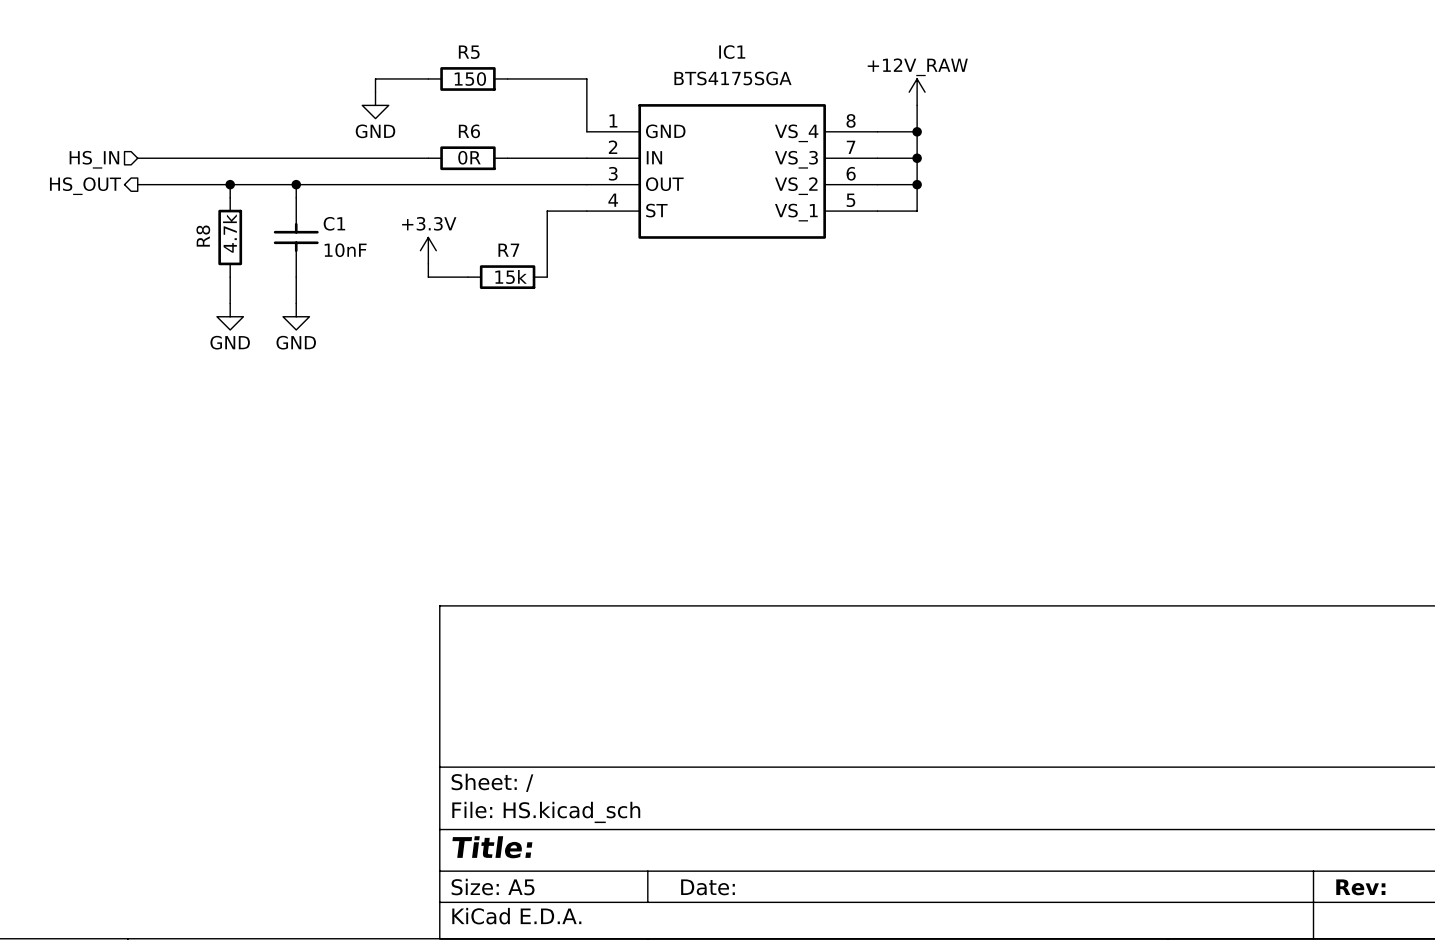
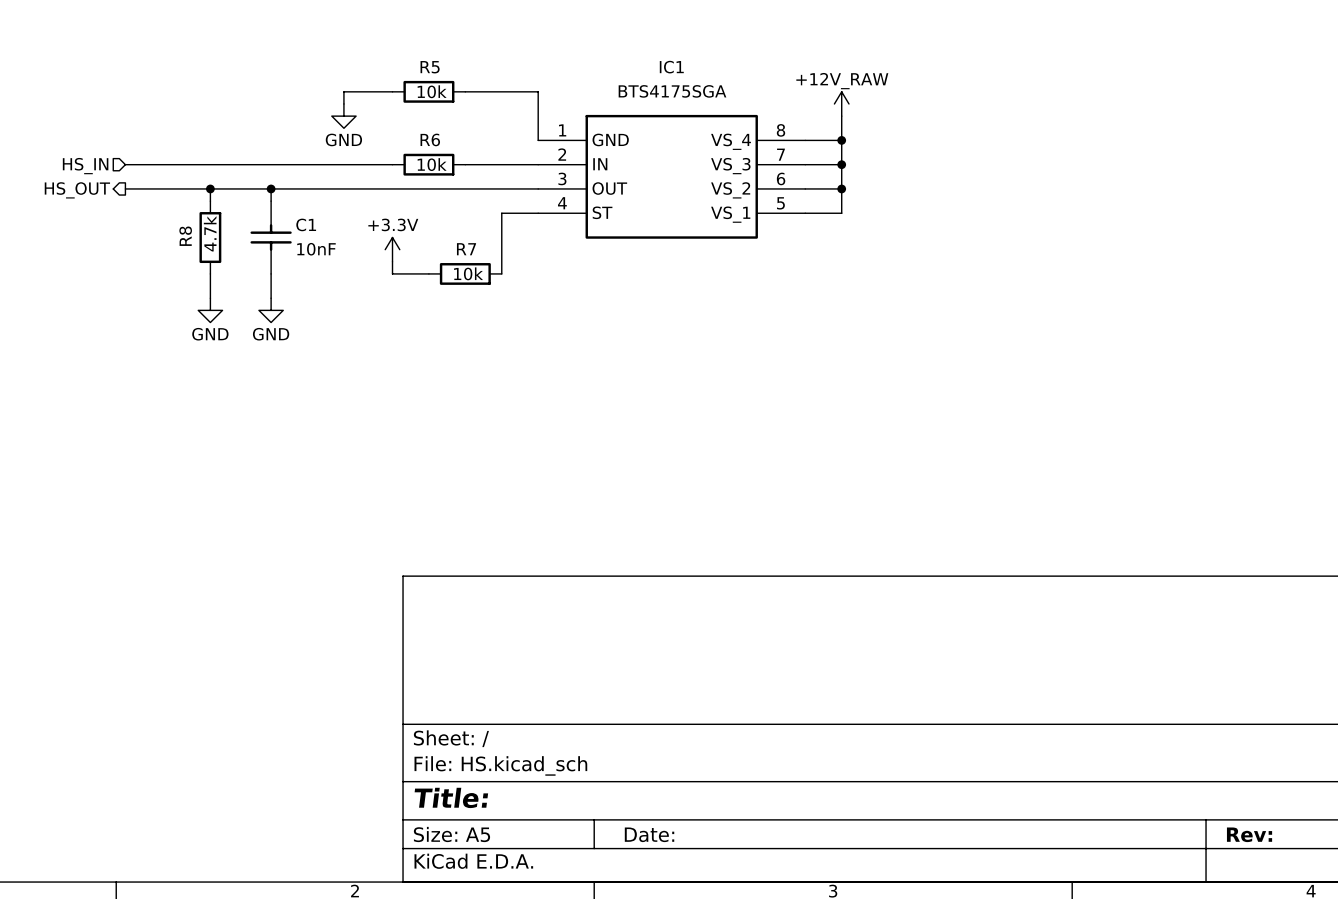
R5 value: 150 (470, 79) -> 10k (432, 91)
R6 value: 0R (469, 157) -> 10k (432, 164)
R7 value: 15k (511, 277) -> 10k (468, 273)

